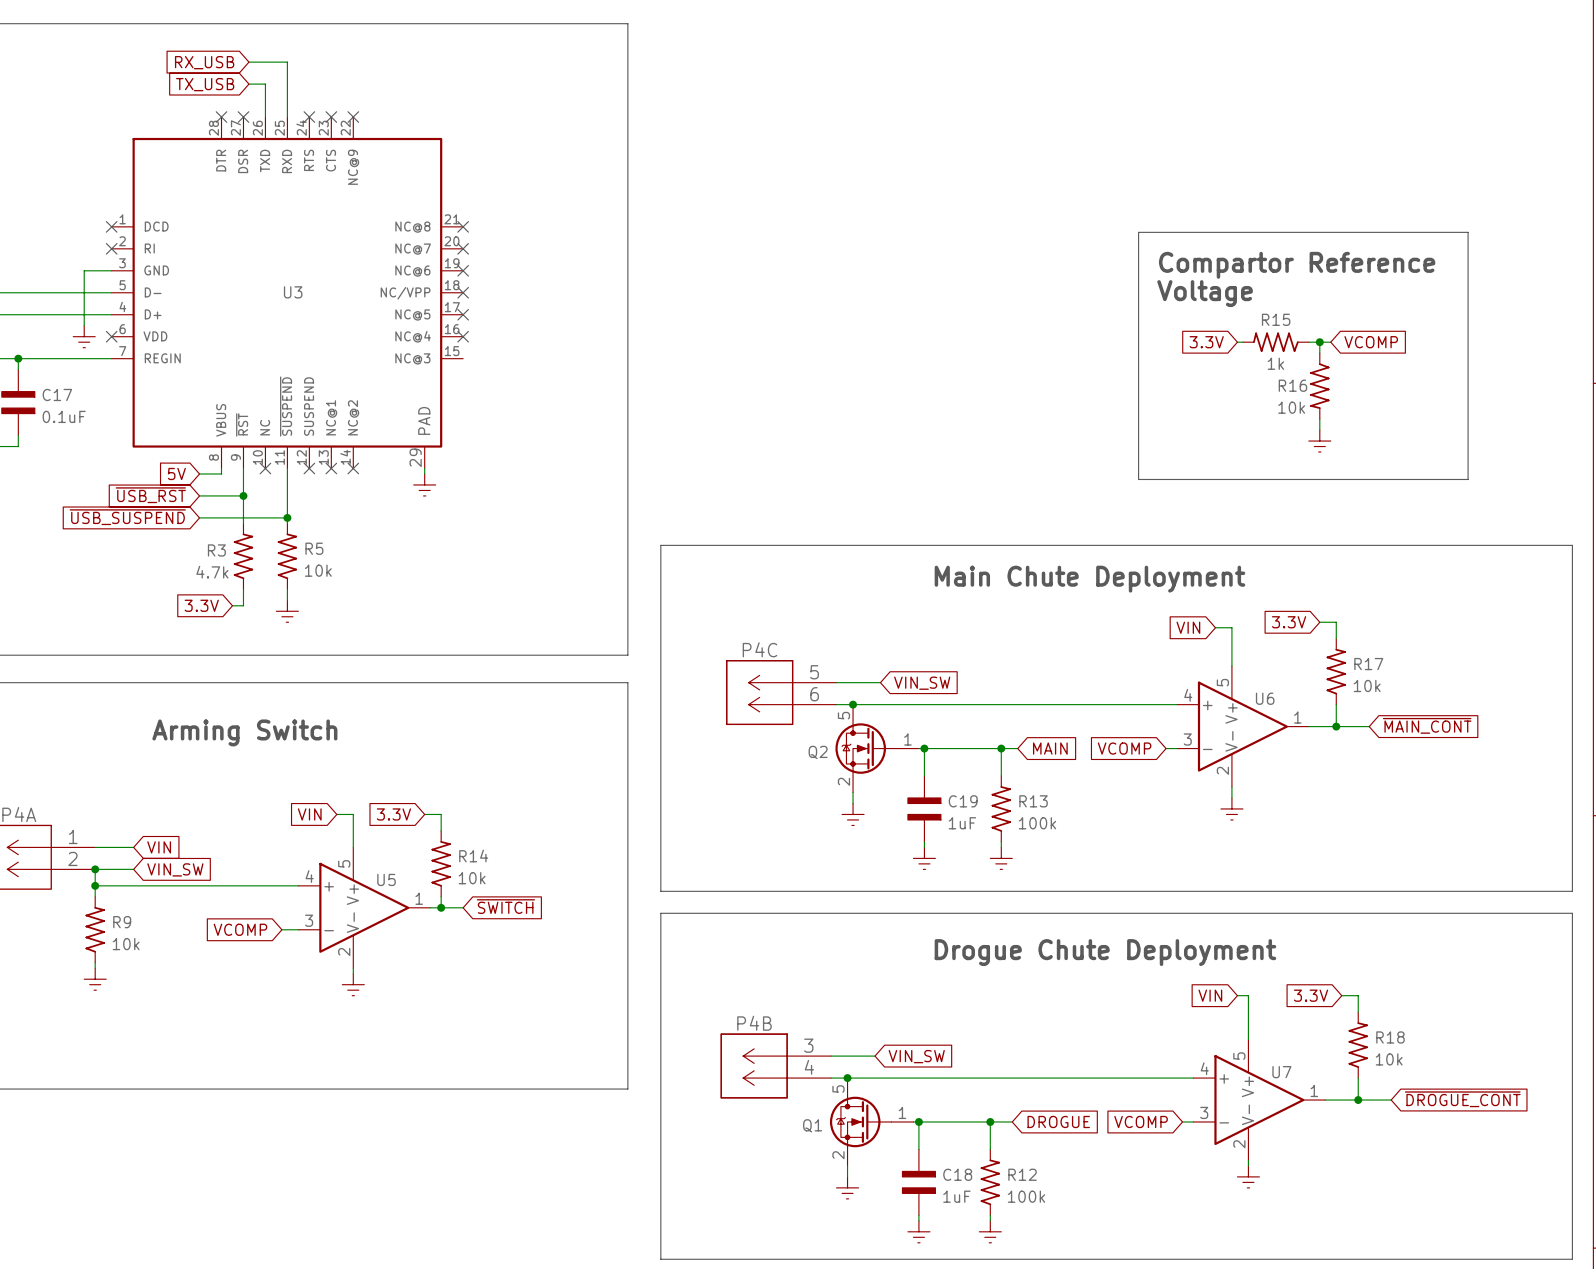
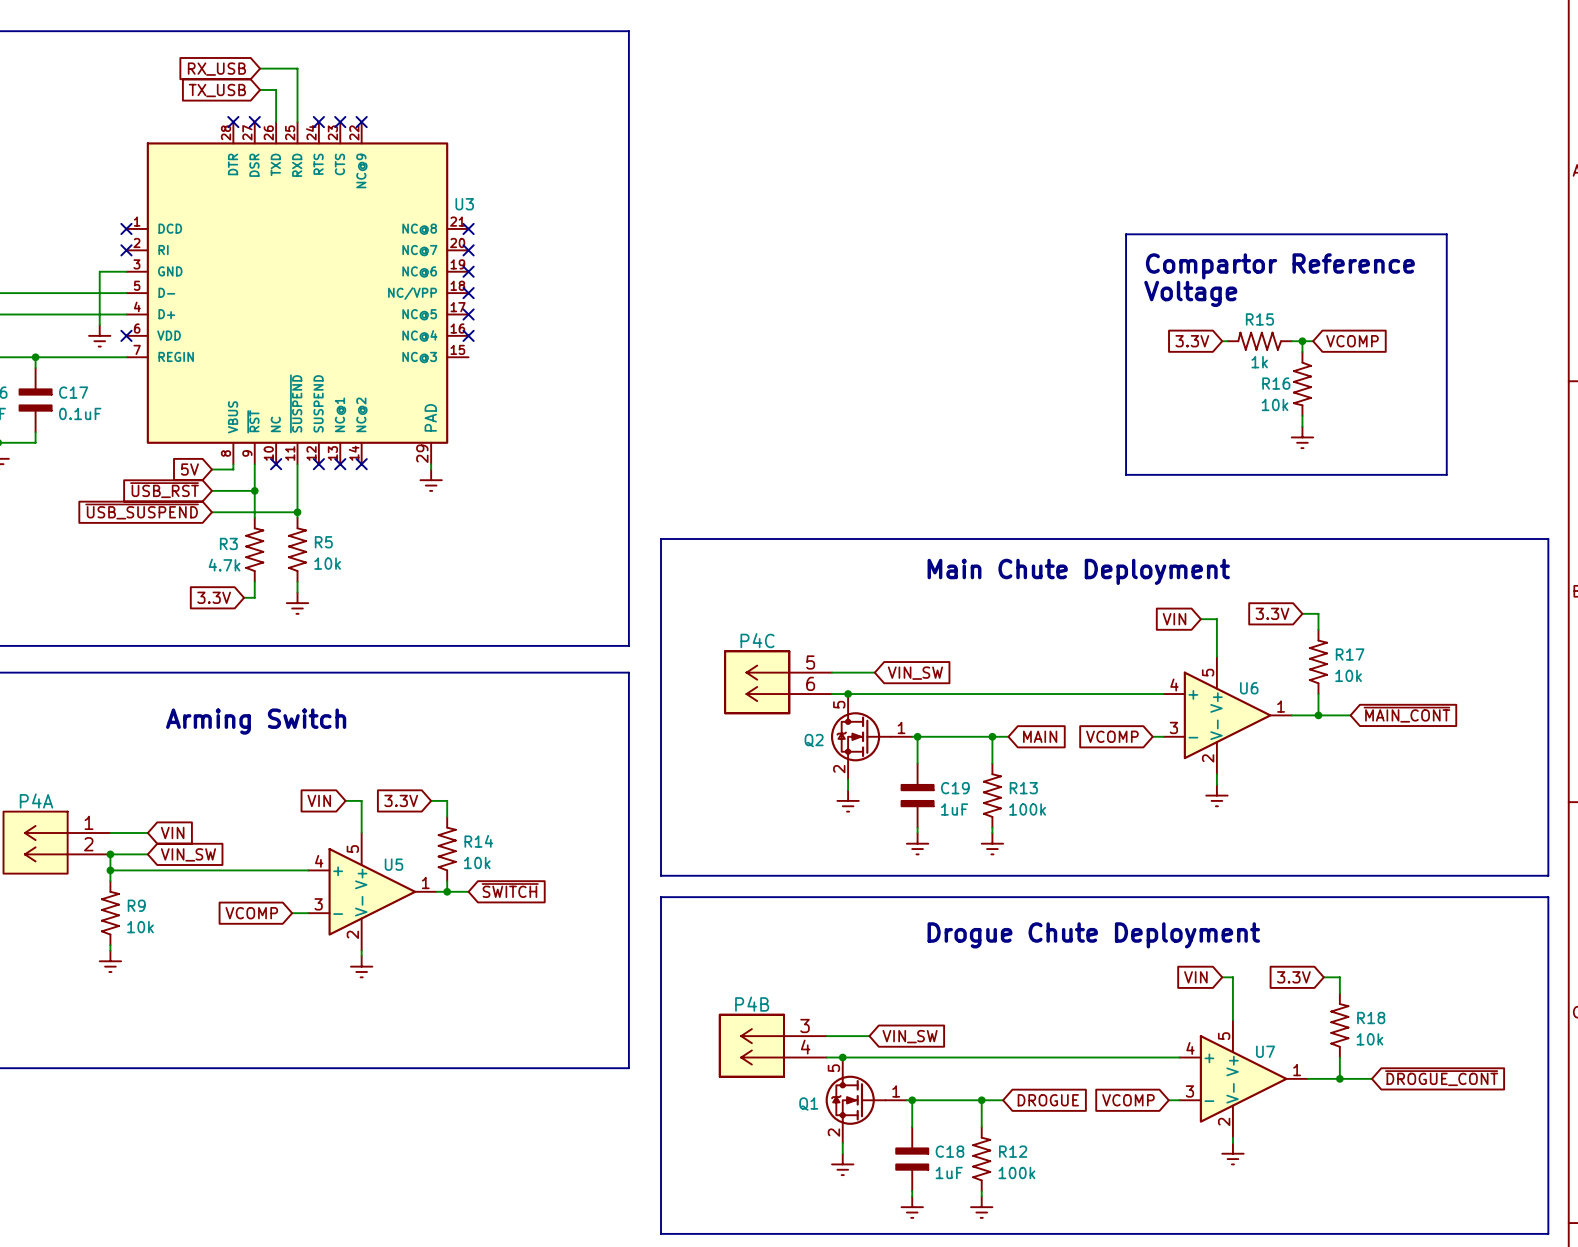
U3 name position: U3 (293, 292) -> U3 (464, 204)

